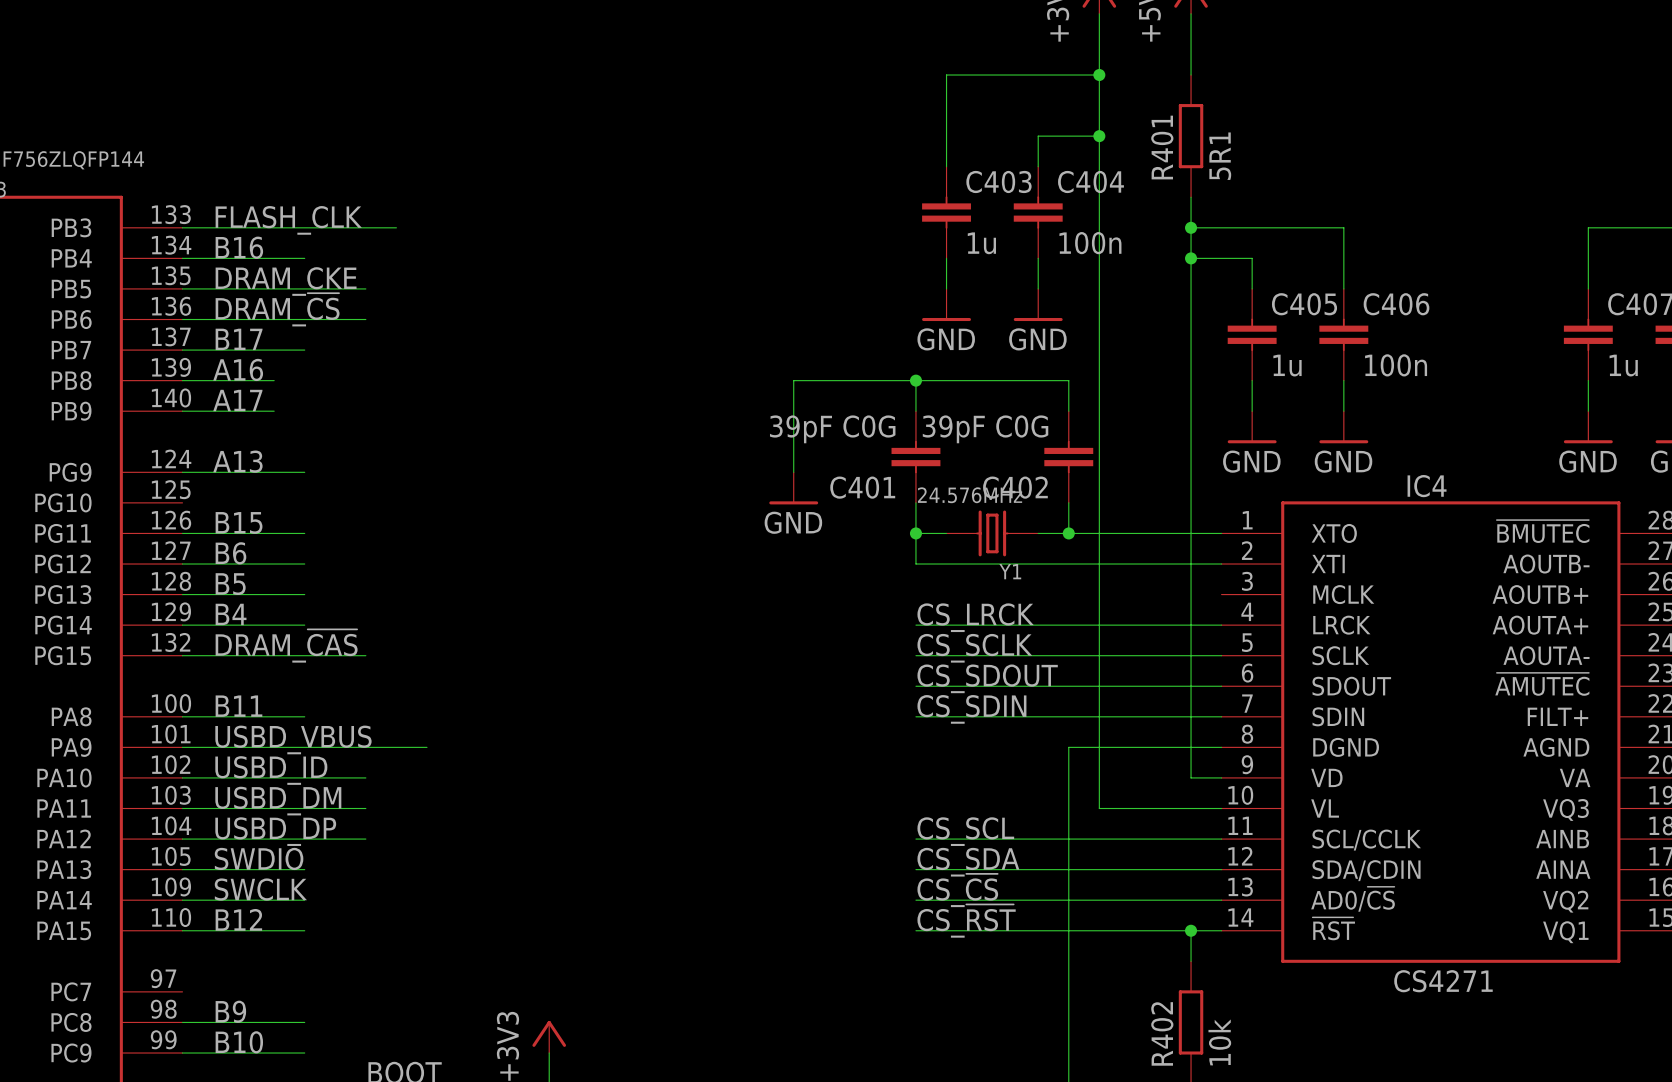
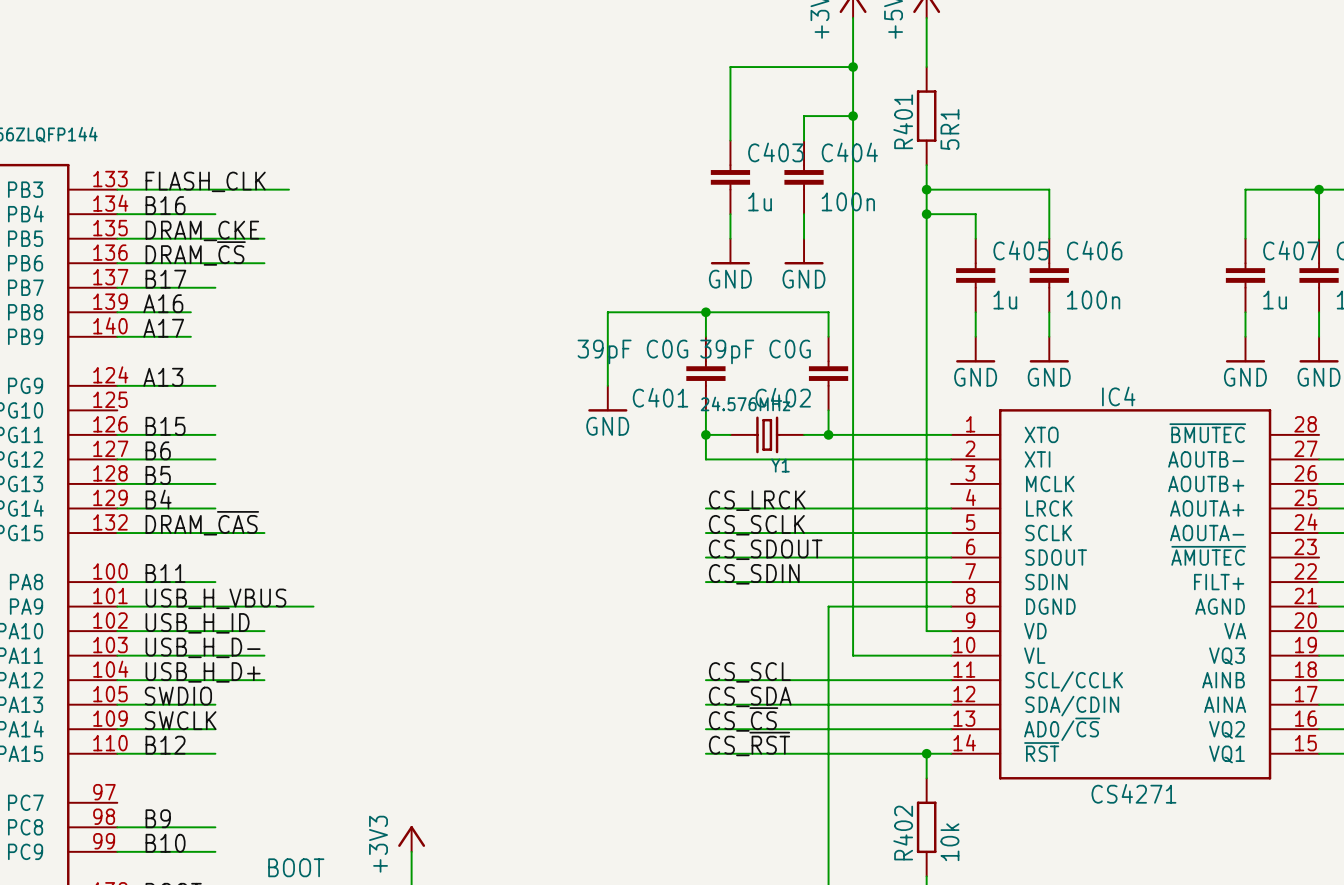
label: USBD_VBUS (293, 739) -> USB_H_VBUS (215, 598)
label: USBD_ID (271, 770) -> USB_H_ID (197, 623)
label: USBD_DM (278, 801) -> USB_H_D- (203, 647)
label: USBD_DP (275, 831) -> USB_H_D+ (203, 672)

